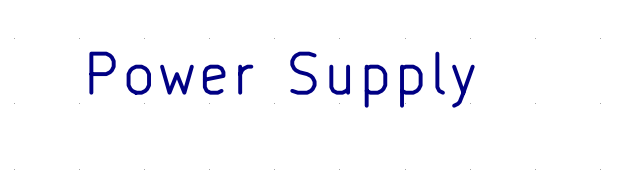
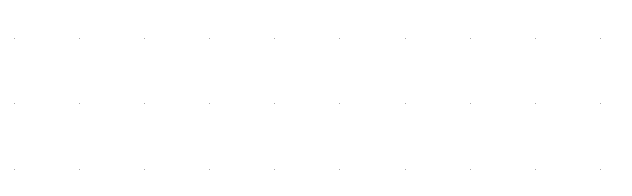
text: Power Supply (282, 79) -> none

